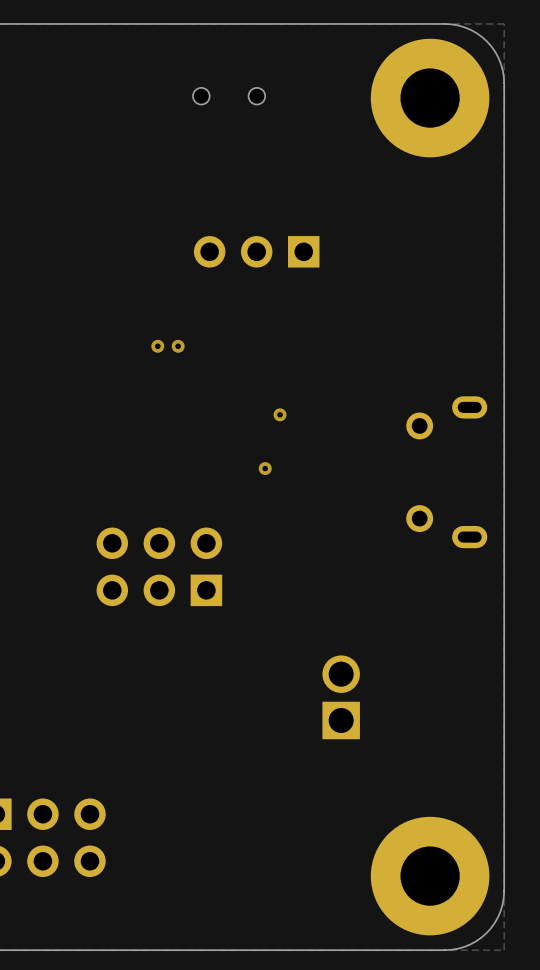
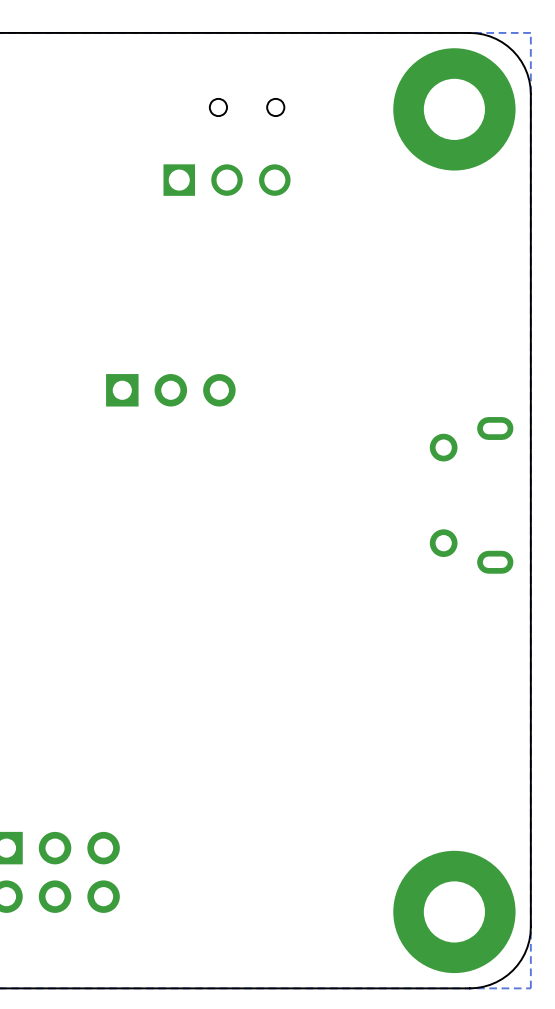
part: none -> (227, 180)
part rotation: 0° (256, 251) -> 180° (170, 390)
part position: (256, 251) -> (170, 390)
via: (157, 346) -> none
via: (178, 346) -> none
via: (280, 414) -> none
via: (265, 468) -> none
part: (159, 566) -> none
part: (341, 697) -> none

